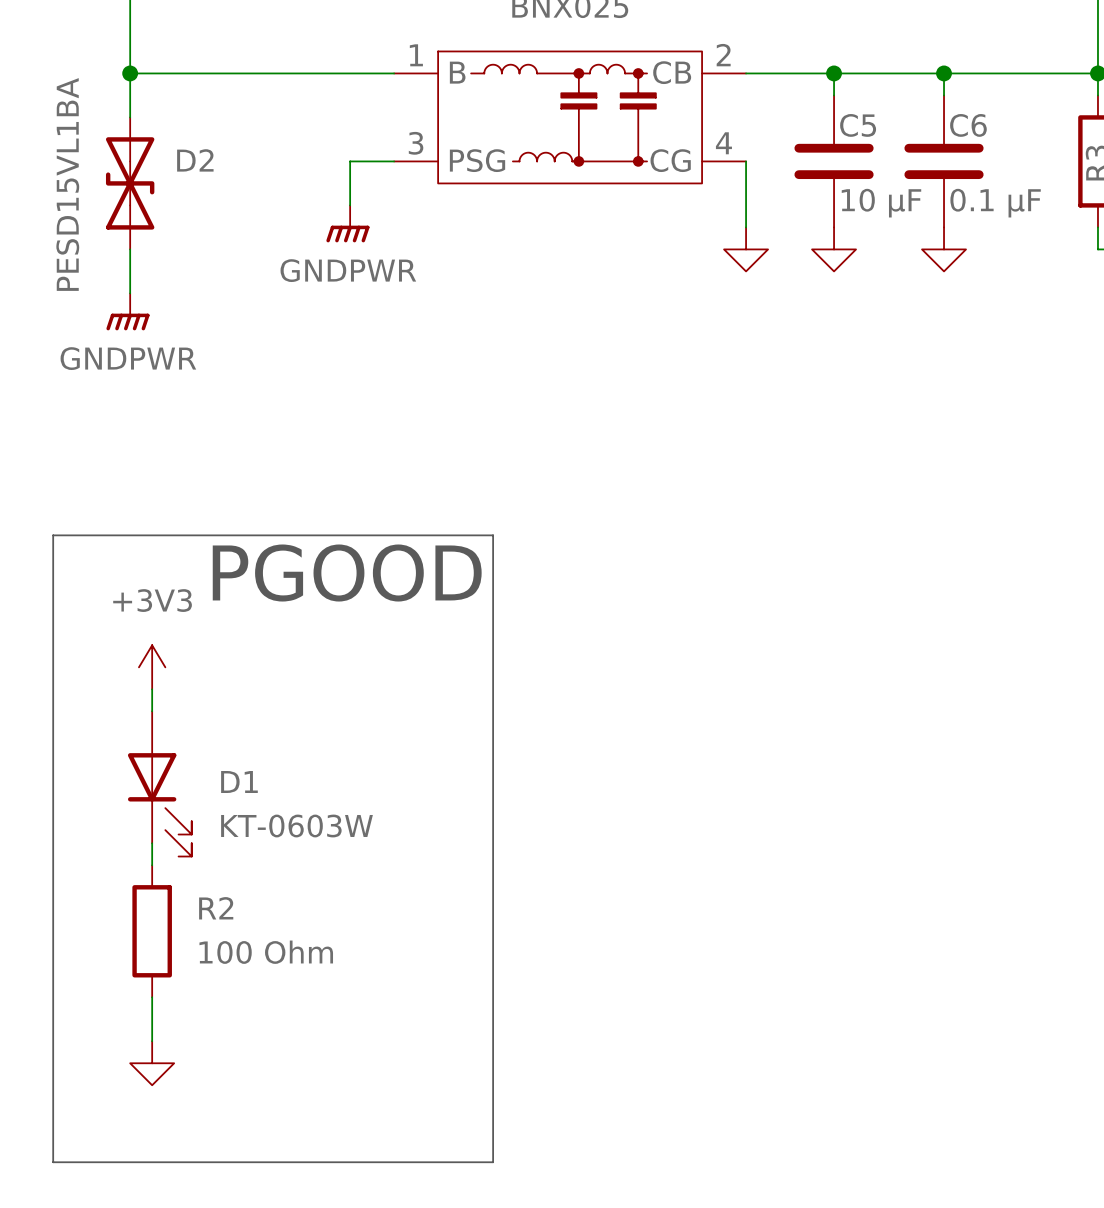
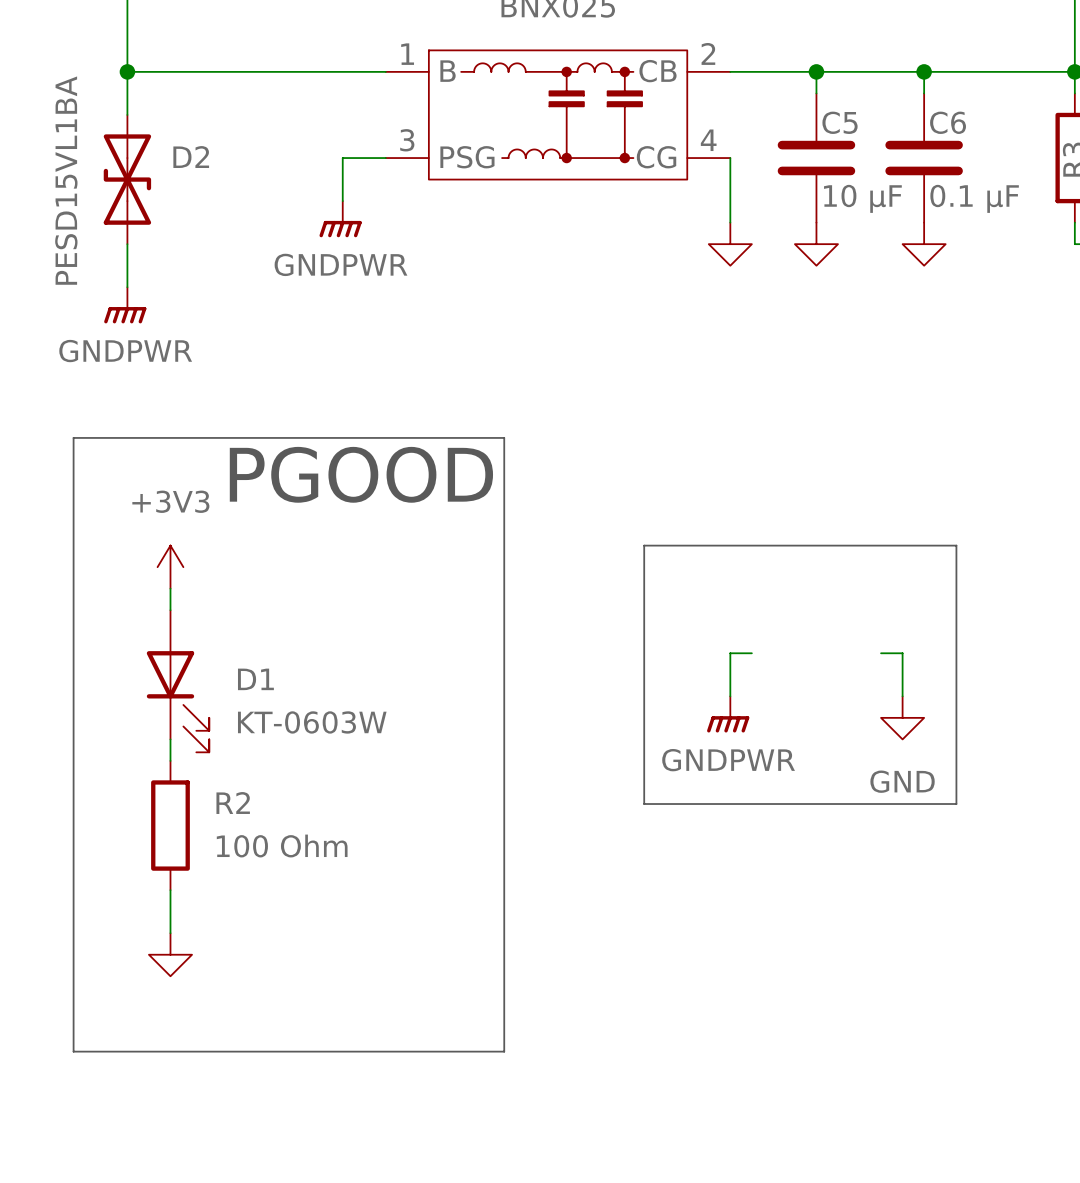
line: (53, 535) (493, 535) (493, 1162) (53, 1162) (53, 535) -> (73, 437) (504, 437) (504, 1051) (73, 1051) (73, 437)
line: none -> (644, 545) (956, 545) (956, 804) (644, 804) (644, 545)
text position: PGOOD (347, 573) -> PGOOD (361, 474)
power symbol position: +3V3 (152, 667) -> +3V3 (170, 567)
wire: none -> (751, 653) (730, 653) (730, 696)
wire: none -> (881, 653) (902, 653) (902, 696)
wire: (152, 689) (152, 711) -> (170, 588) (170, 610)
power symbol: none -> GNDPWR (728, 714)
power symbol: none -> GND (902, 717)
D1 position: (159, 783) -> (178, 681)
wire: (152, 843) (152, 865) -> (170, 739) (170, 760)
R2 position: (152, 931) -> (170, 825)
wire: (152, 997) (152, 1041) -> (170, 890) (170, 933)
power symbol position: (152, 1063) -> (170, 954)

